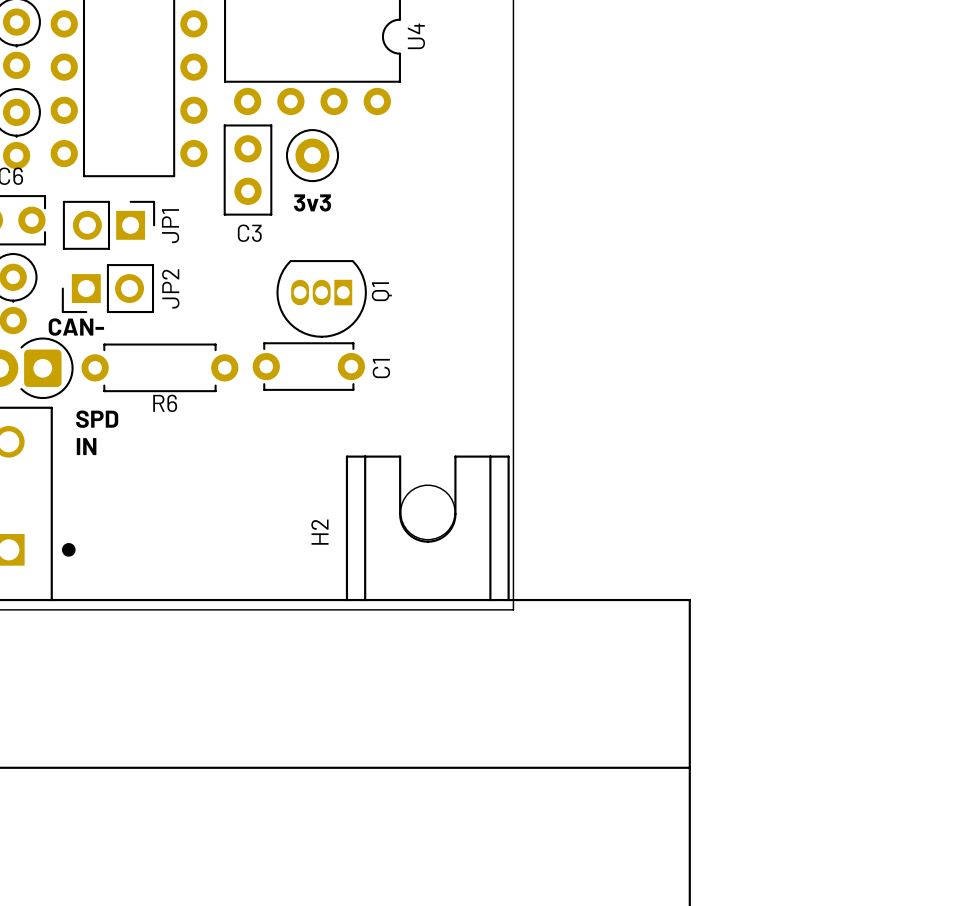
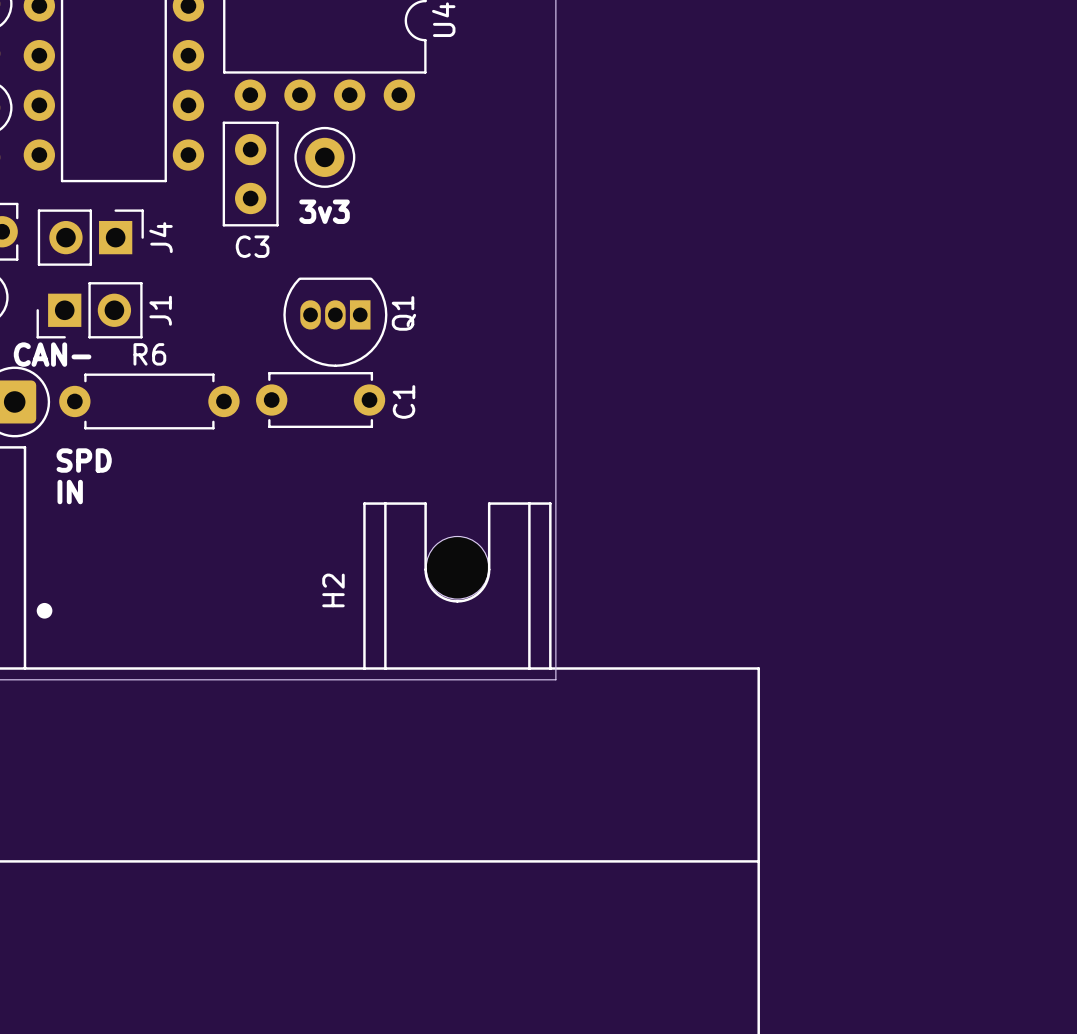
JP1 name: JP1 (170, 226) -> J4 (161, 237)
JP2 name: JP2 (170, 288) -> J1 (160, 310)
R6 name position: R6 (165, 403) -> R6 (149, 354)

